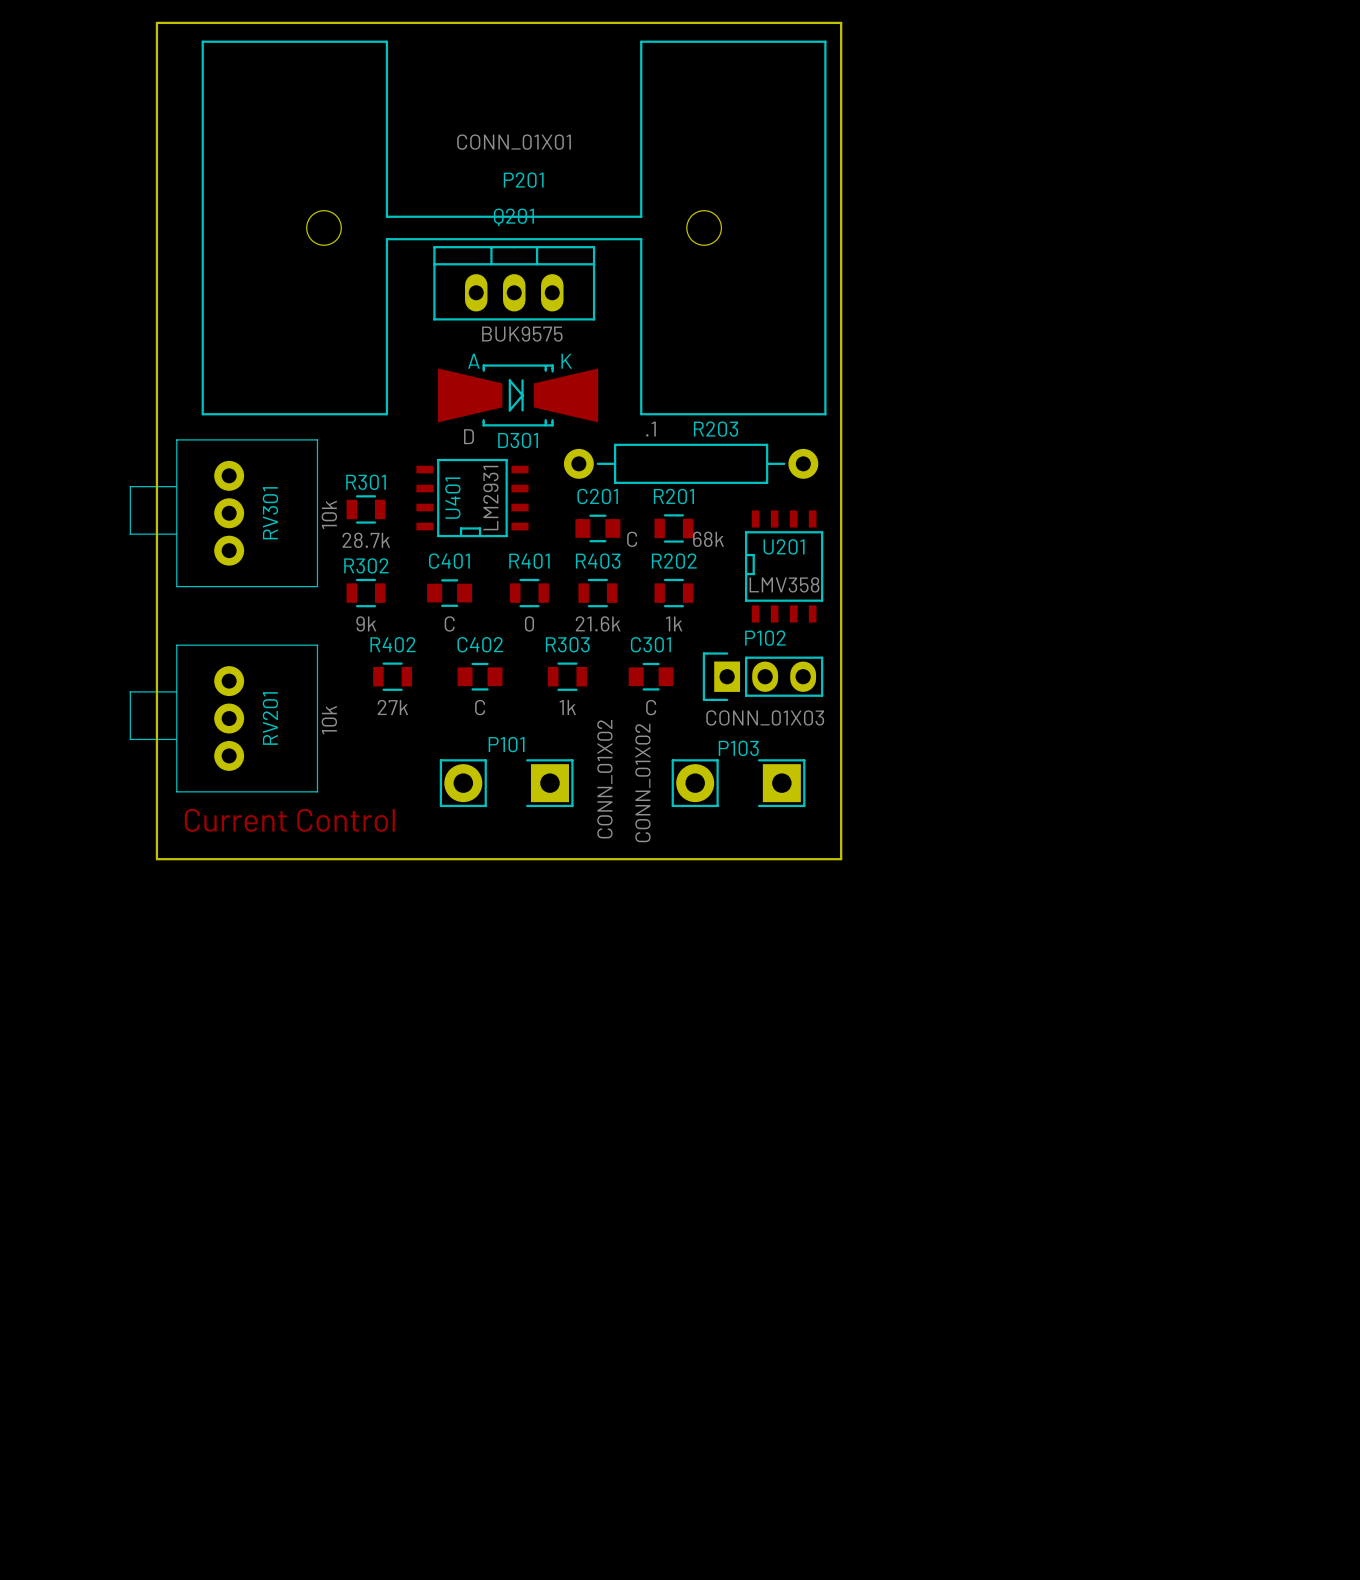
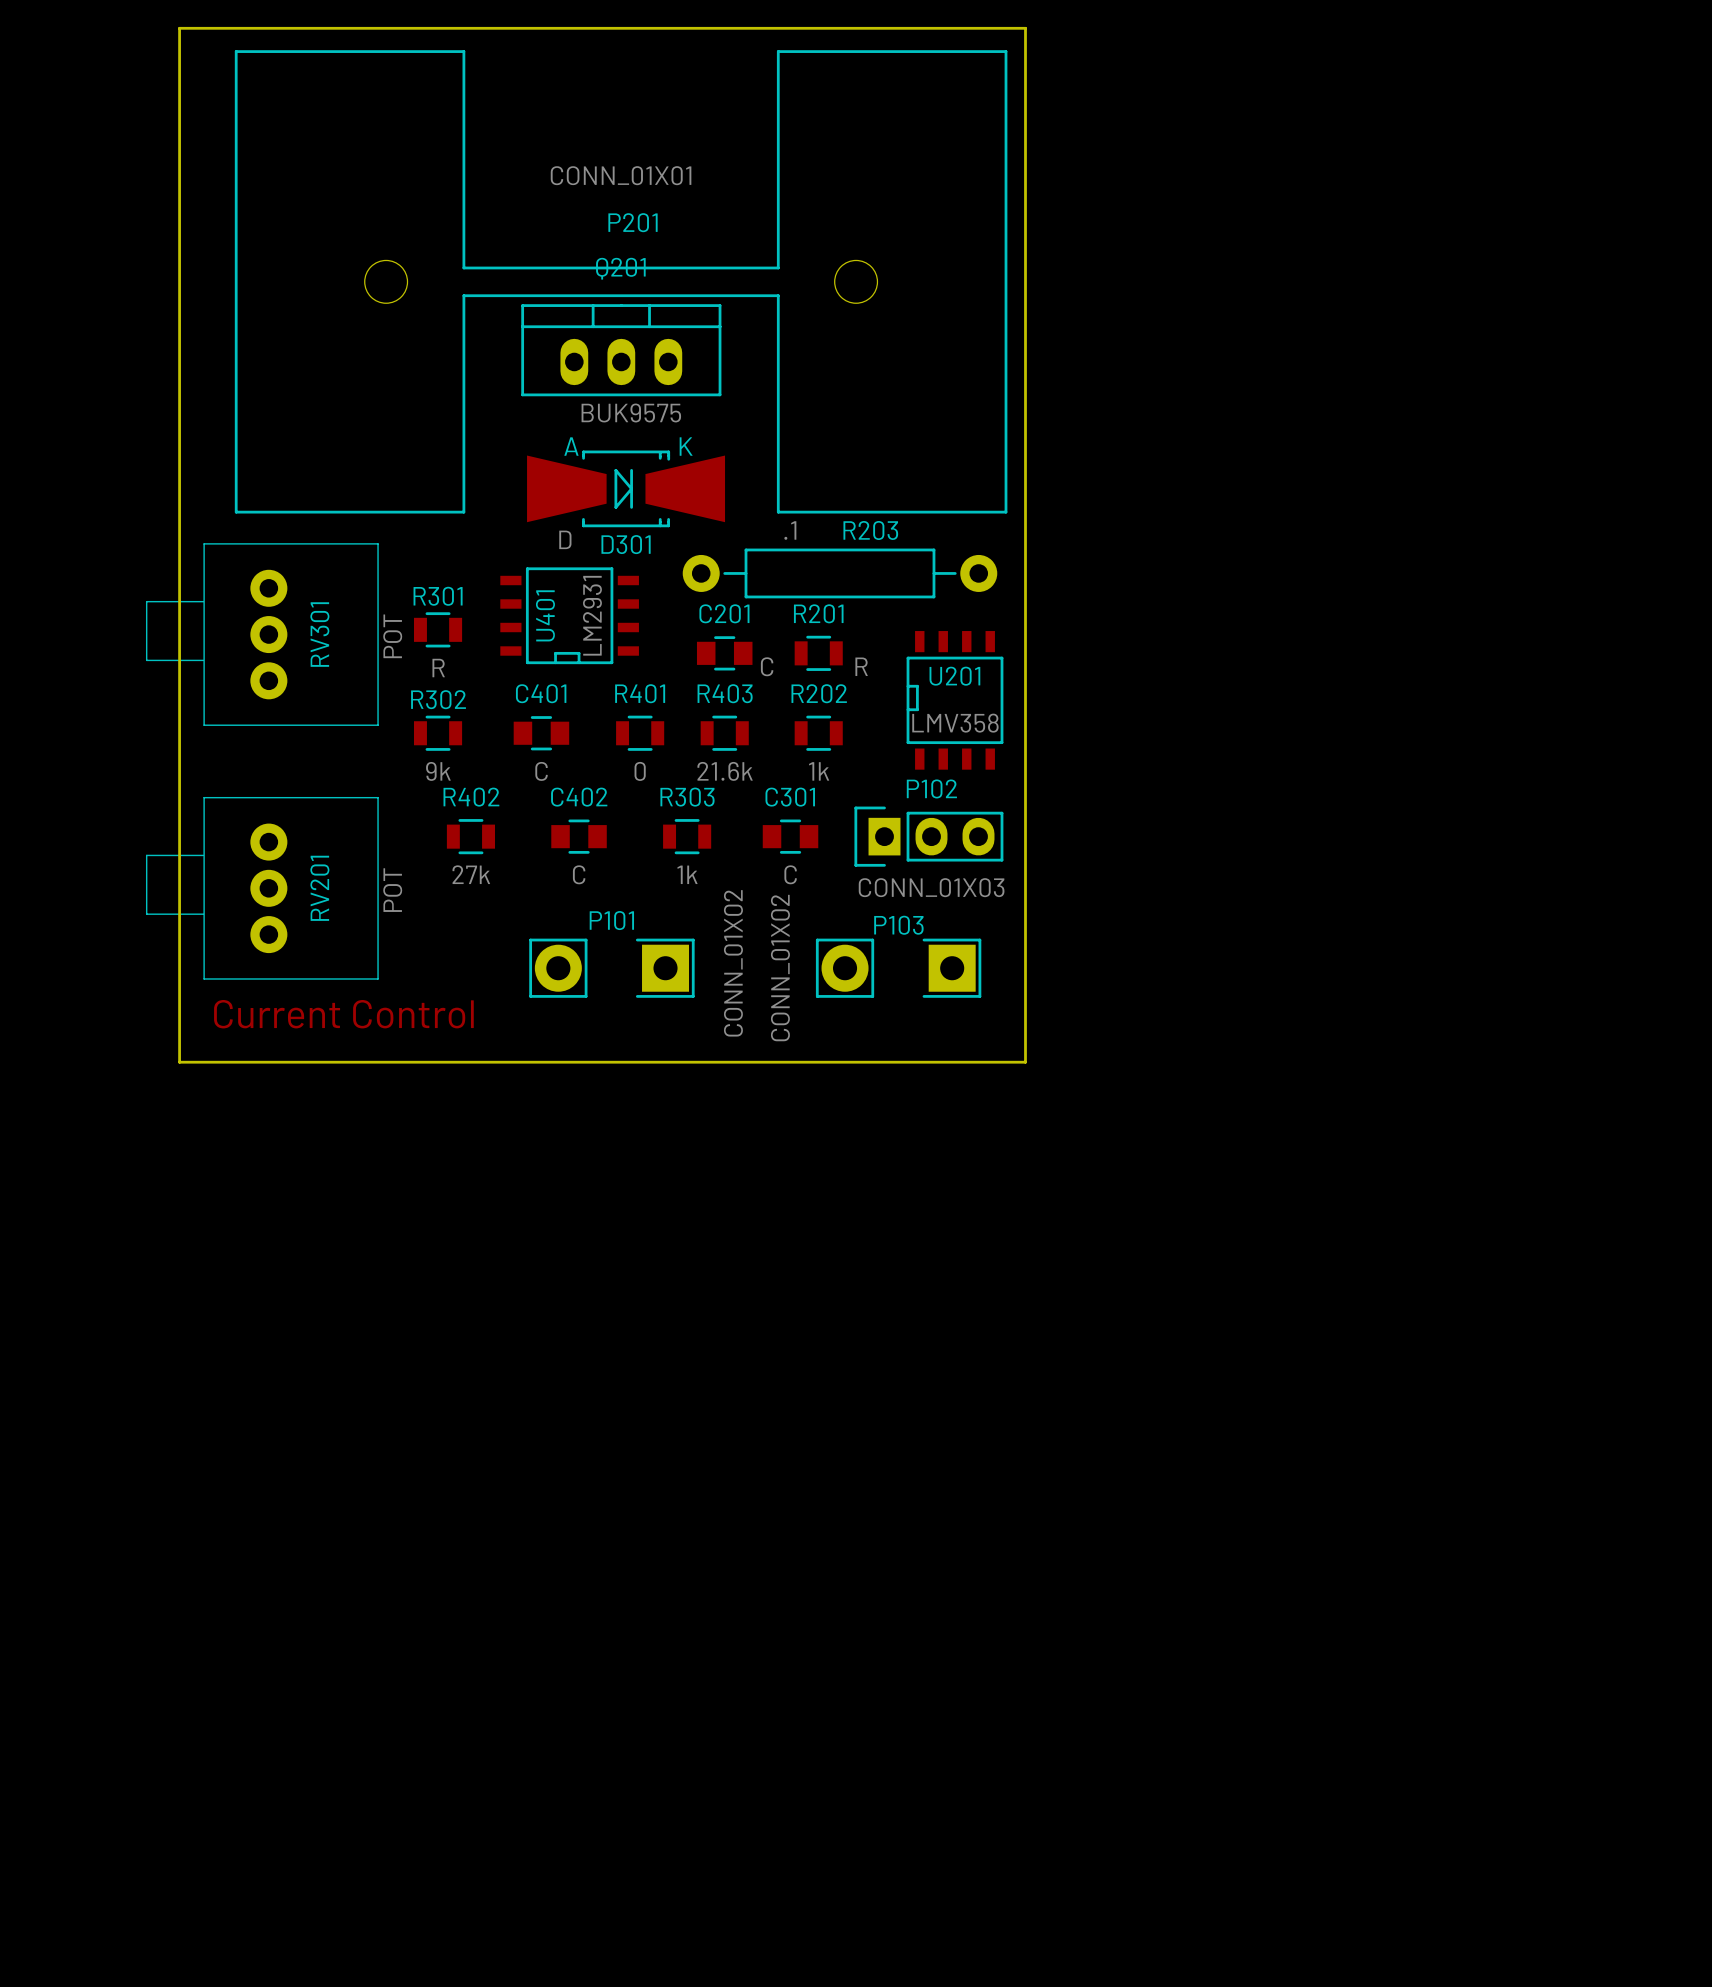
RV301 value: 10k (329, 514) -> POT (392, 636)
R201 value: 68k (708, 539) -> R (861, 666)
R301 value: 28.7k (366, 540) -> R (438, 668)
RV201 value: 10k (329, 720) -> POT (392, 890)

